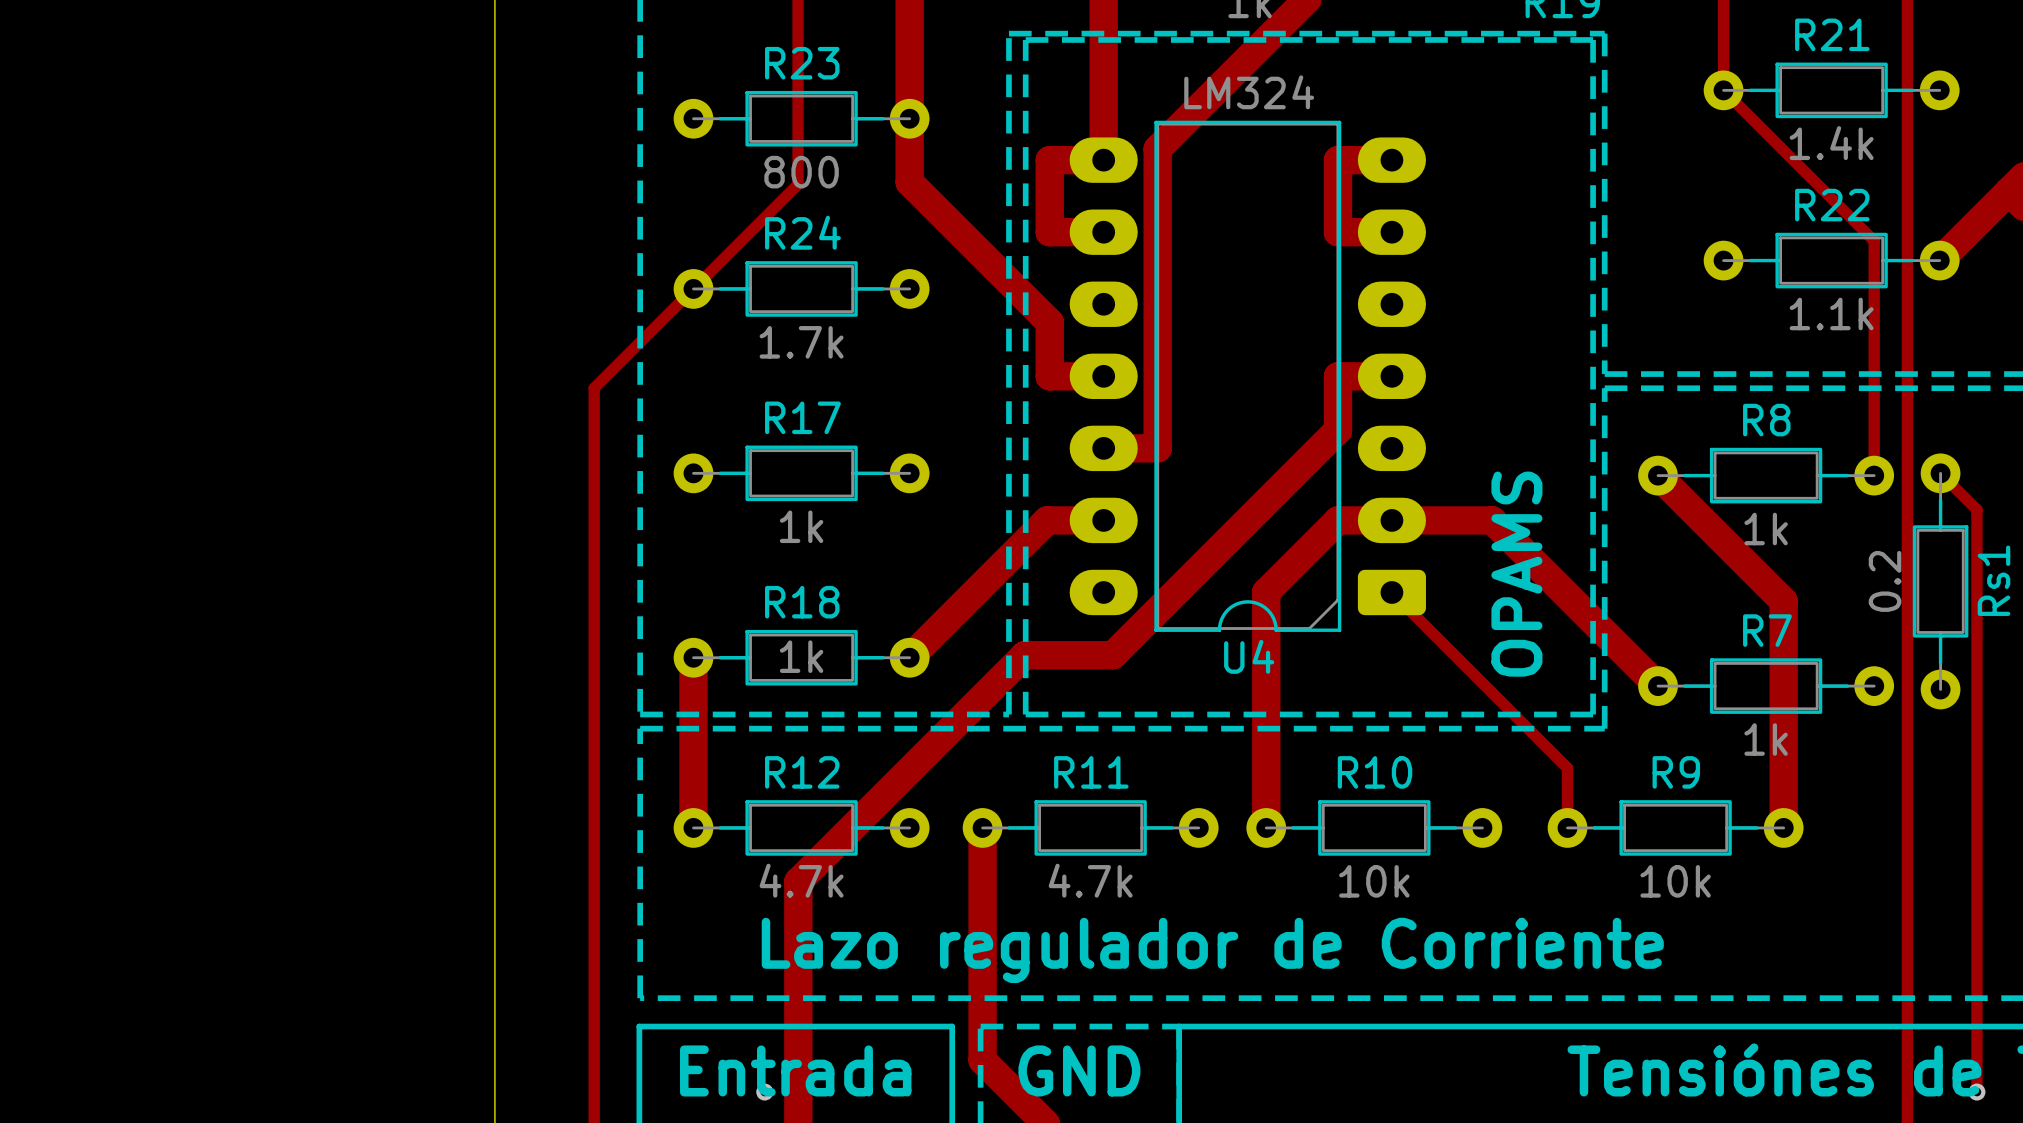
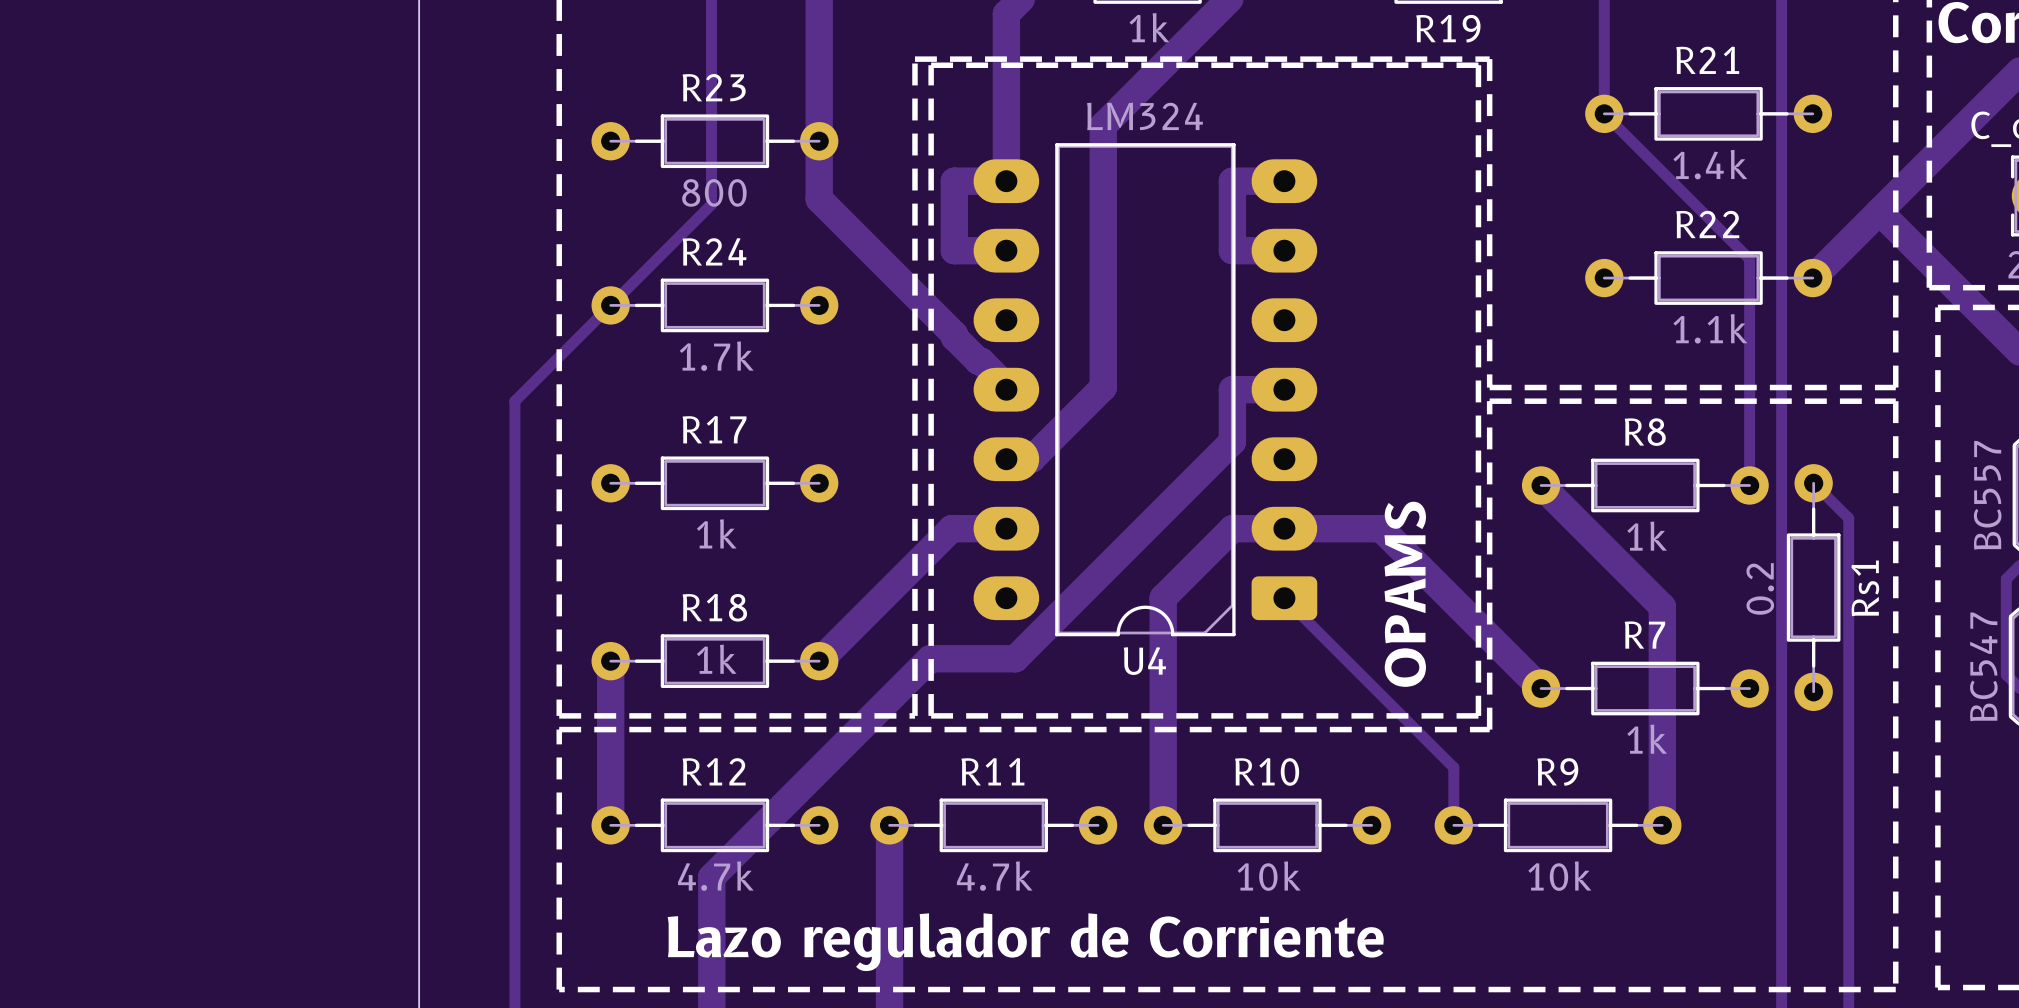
track: (1204, 102) (1157, 149) (1157, 448) (1129, 448) -> (1103, 125) (1103, 387) (1031, 459)
track: (909, 178) (909, 182) (1049, 322) (1049, 376) (1103, 376) -> (819, 199) (954, 334) (954, 337) (1006, 386) (1006, 389)

